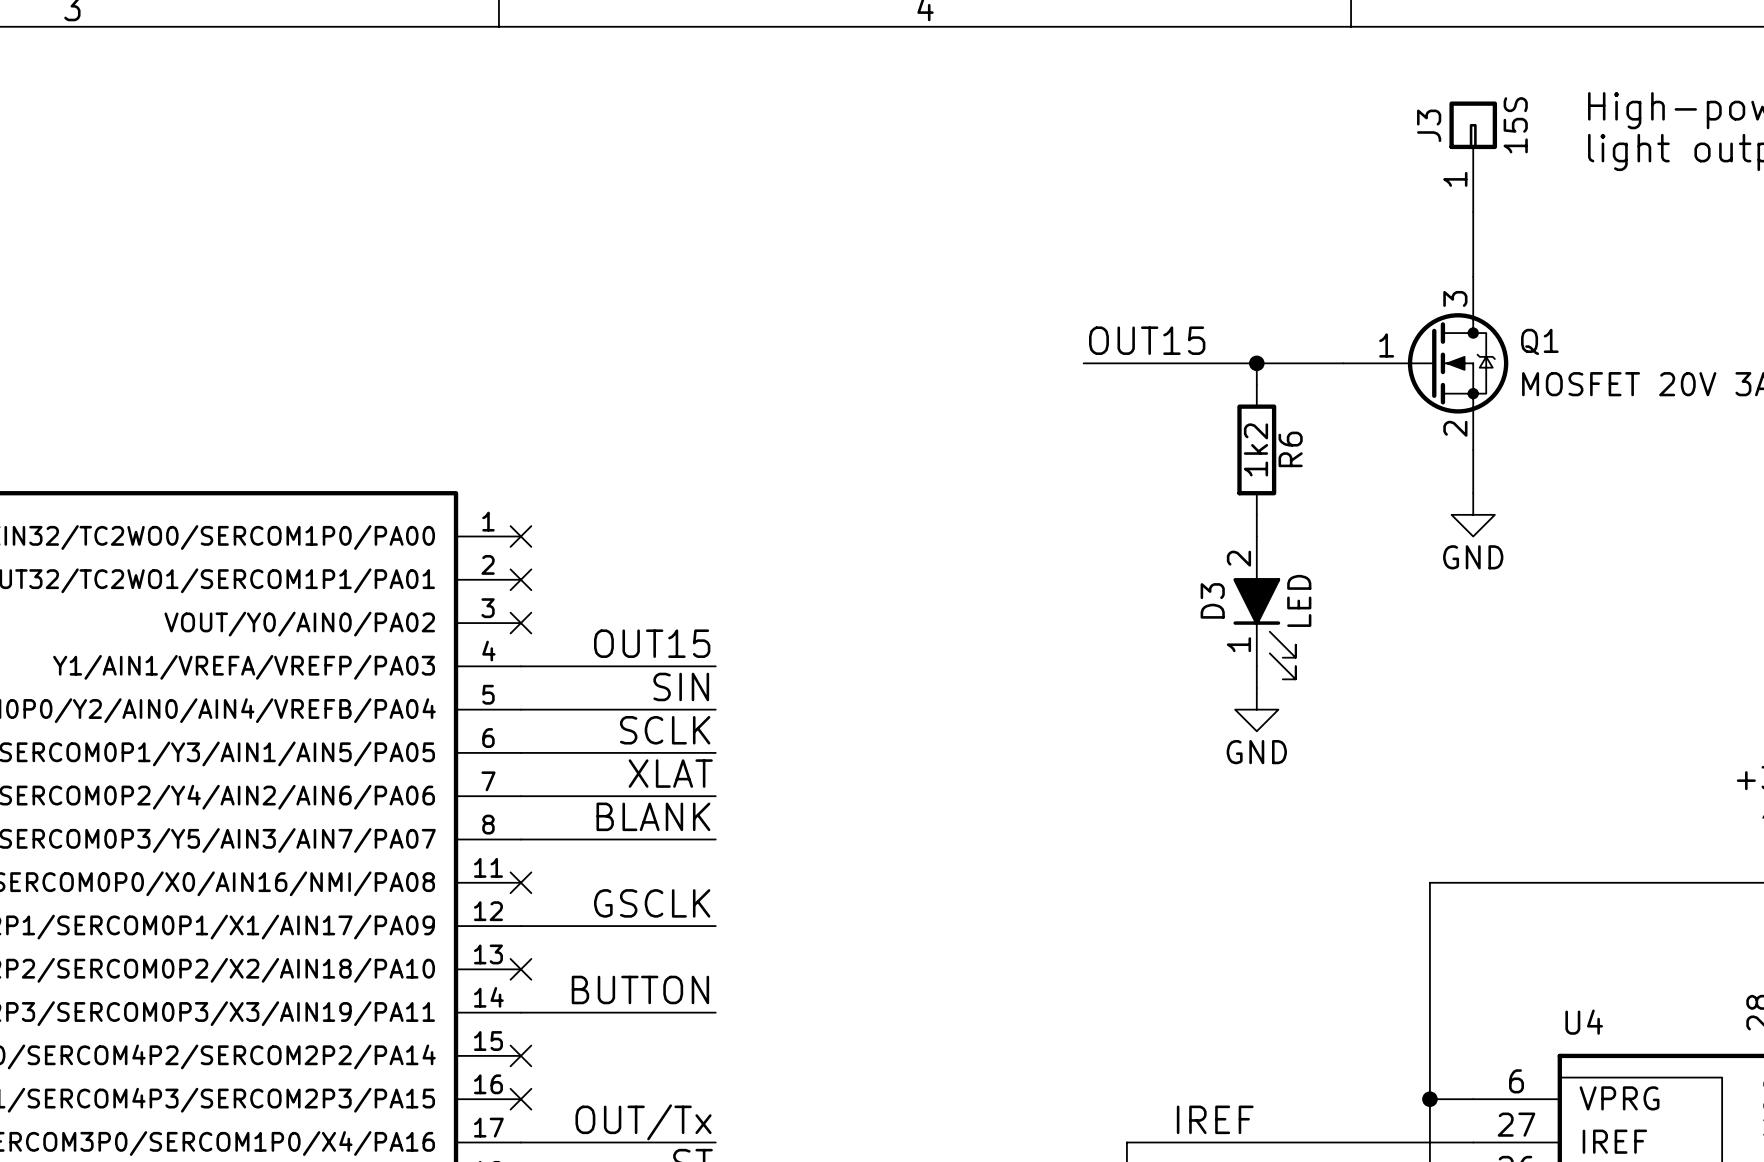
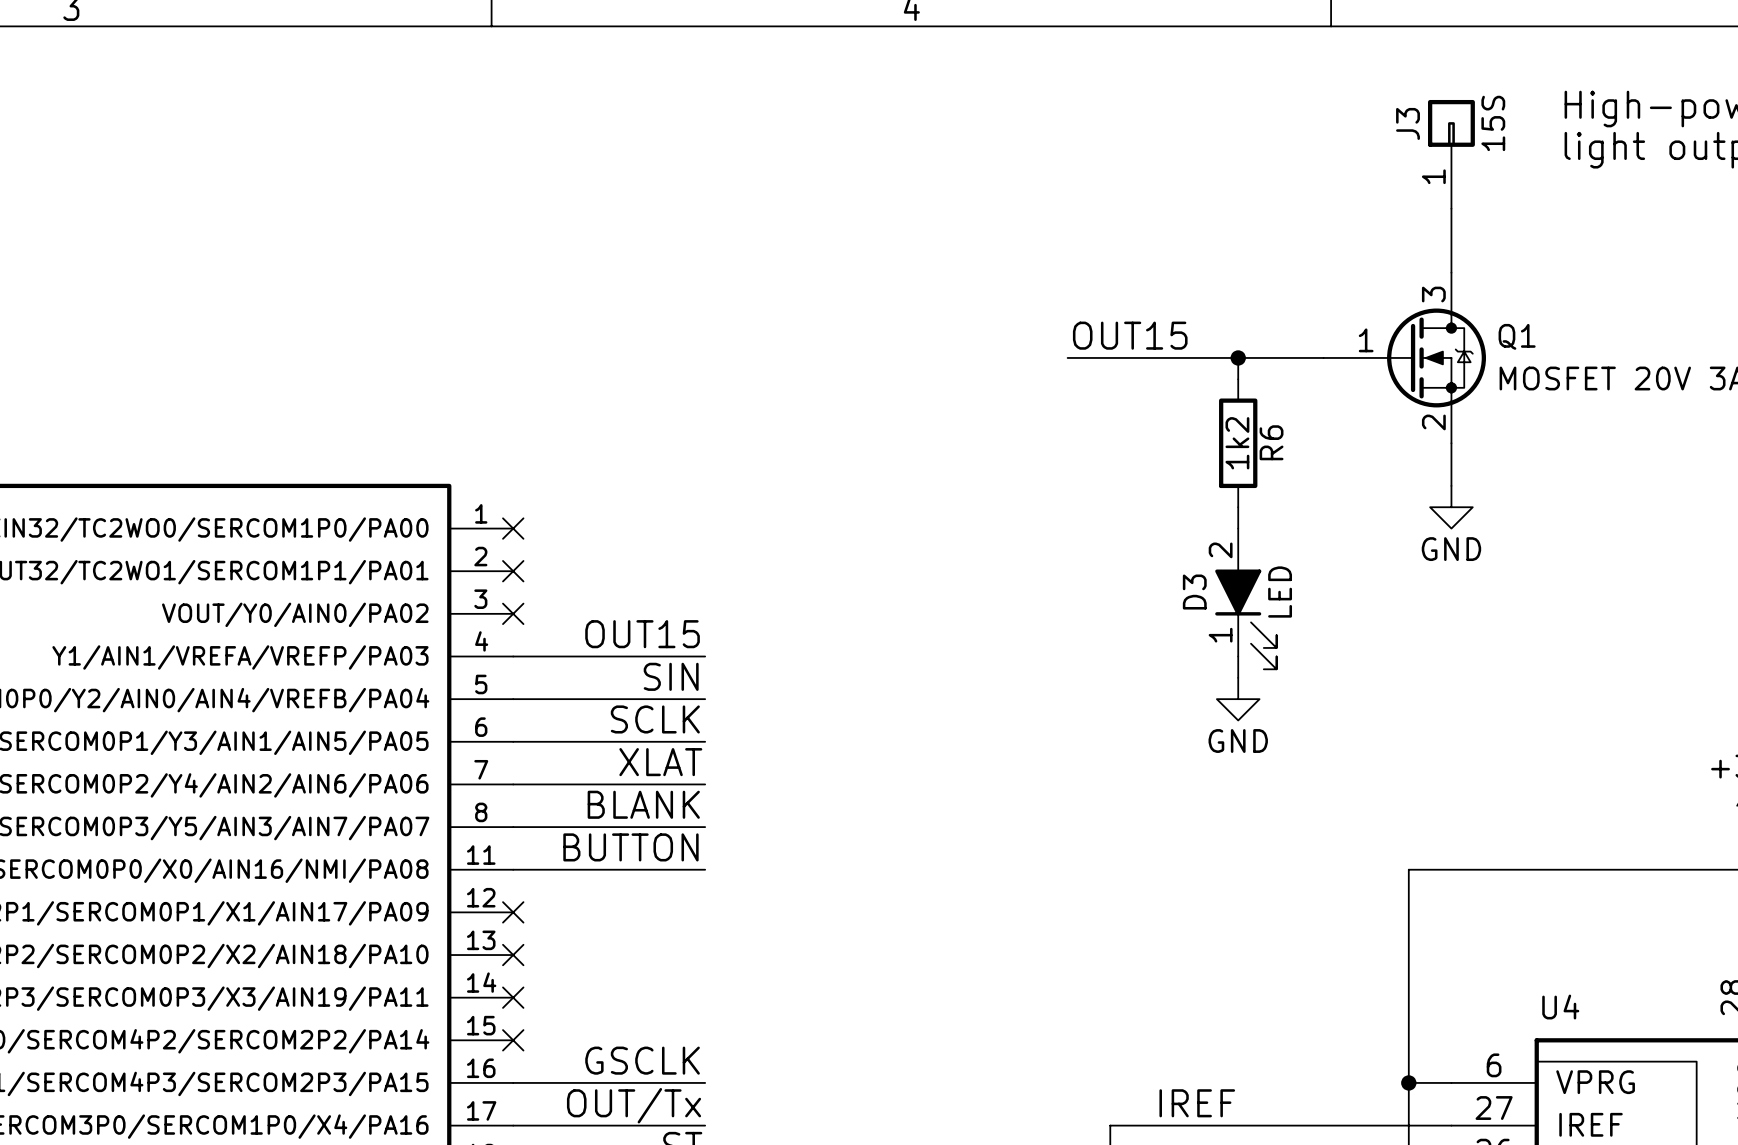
no-connect mark position: (520, 882) -> (513, 912)
label position: GSCLK (652, 903) -> GSCLK (642, 1060)
wire: (520, 926) (715, 926) -> (513, 869) (705, 869)
label position: BUTTON (640, 989) -> BUTTON (630, 847)
wire: (520, 1012) (715, 1012) -> (513, 1082) (705, 1082)
no-connect mark: none -> (513, 997)
no-connect mark: (520, 1099) -> none

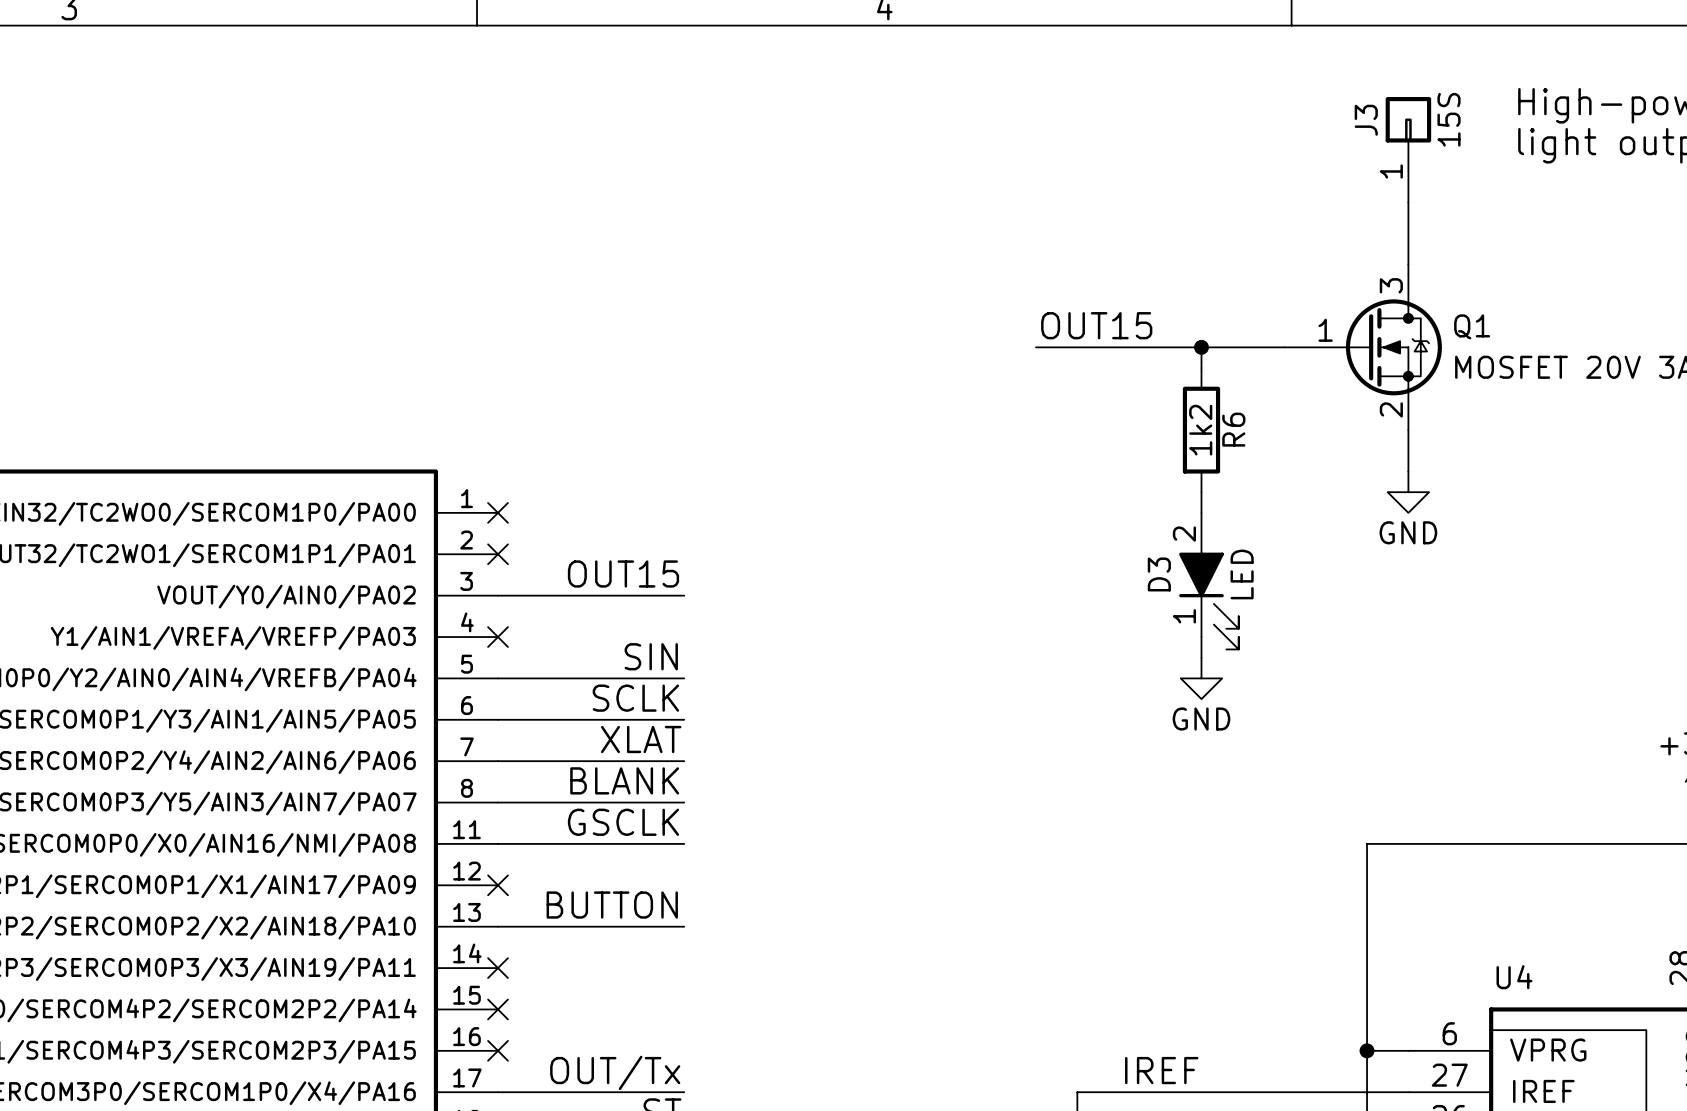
no-connect mark position: (513, 613) -> (498, 637)
label position: OUT15 (642, 634) -> OUT15 (623, 573)
wire: (513, 656) (705, 656) -> (498, 595) (684, 595)
label: BUTTON (630, 847) -> GSCLK (623, 822)
label: none -> BUTTON (612, 905)
no-connect mark: (513, 955) -> none
label: GSCLK (642, 1060) -> none
wire: (513, 1082) (705, 1082) -> (498, 926) (684, 926)
no-connect mark: none -> (498, 1050)

